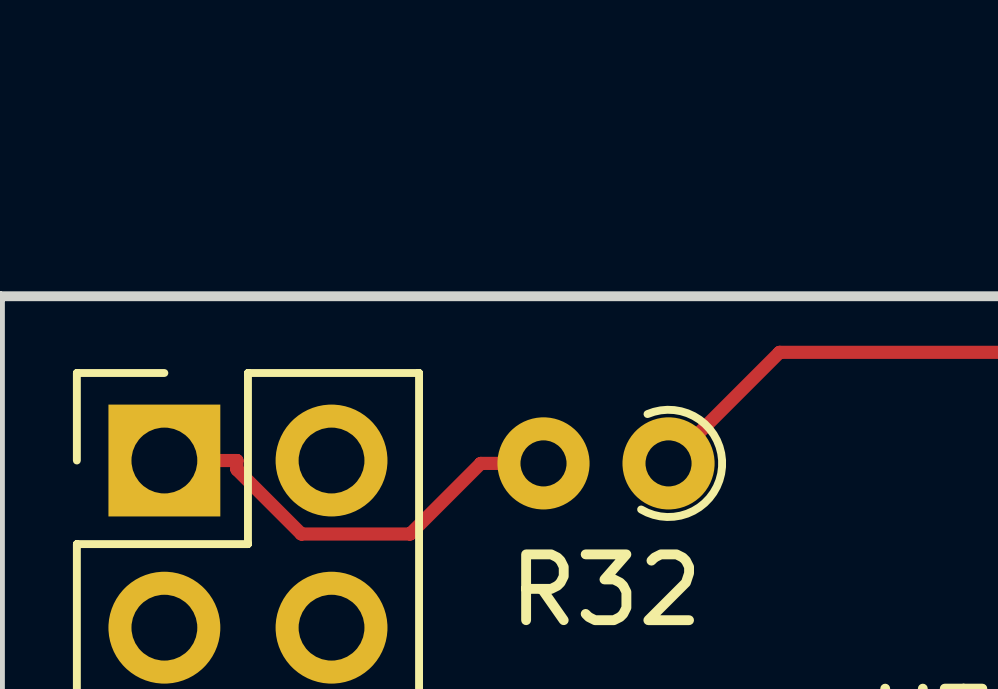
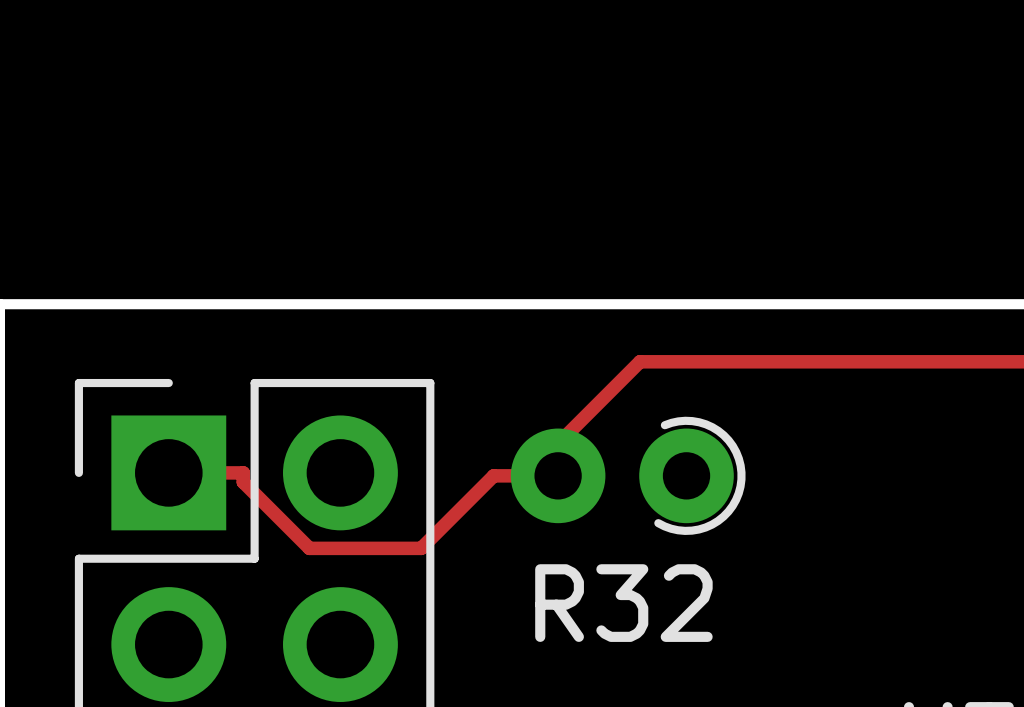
track: (779, 352) (668, 463) -> (800, 361) (639, 361) (525, 475)

